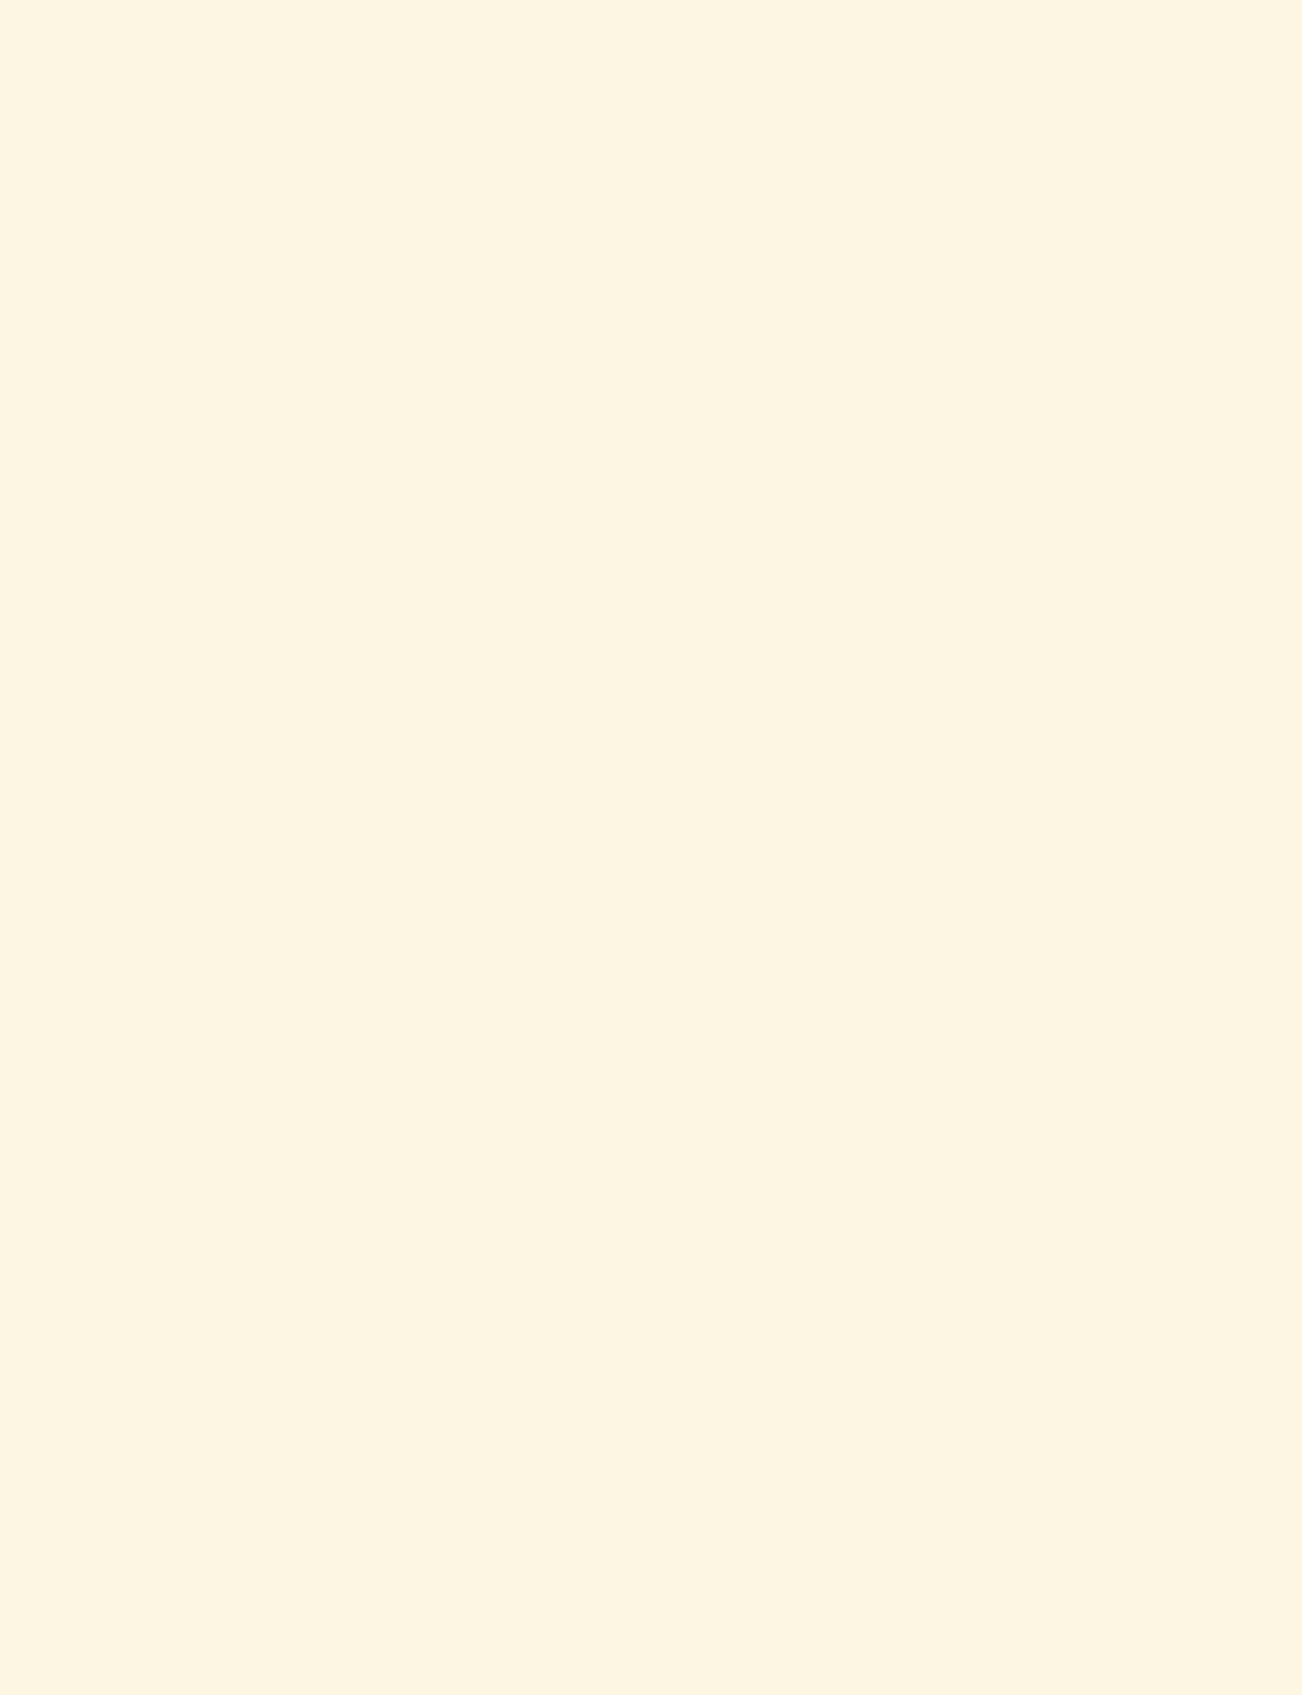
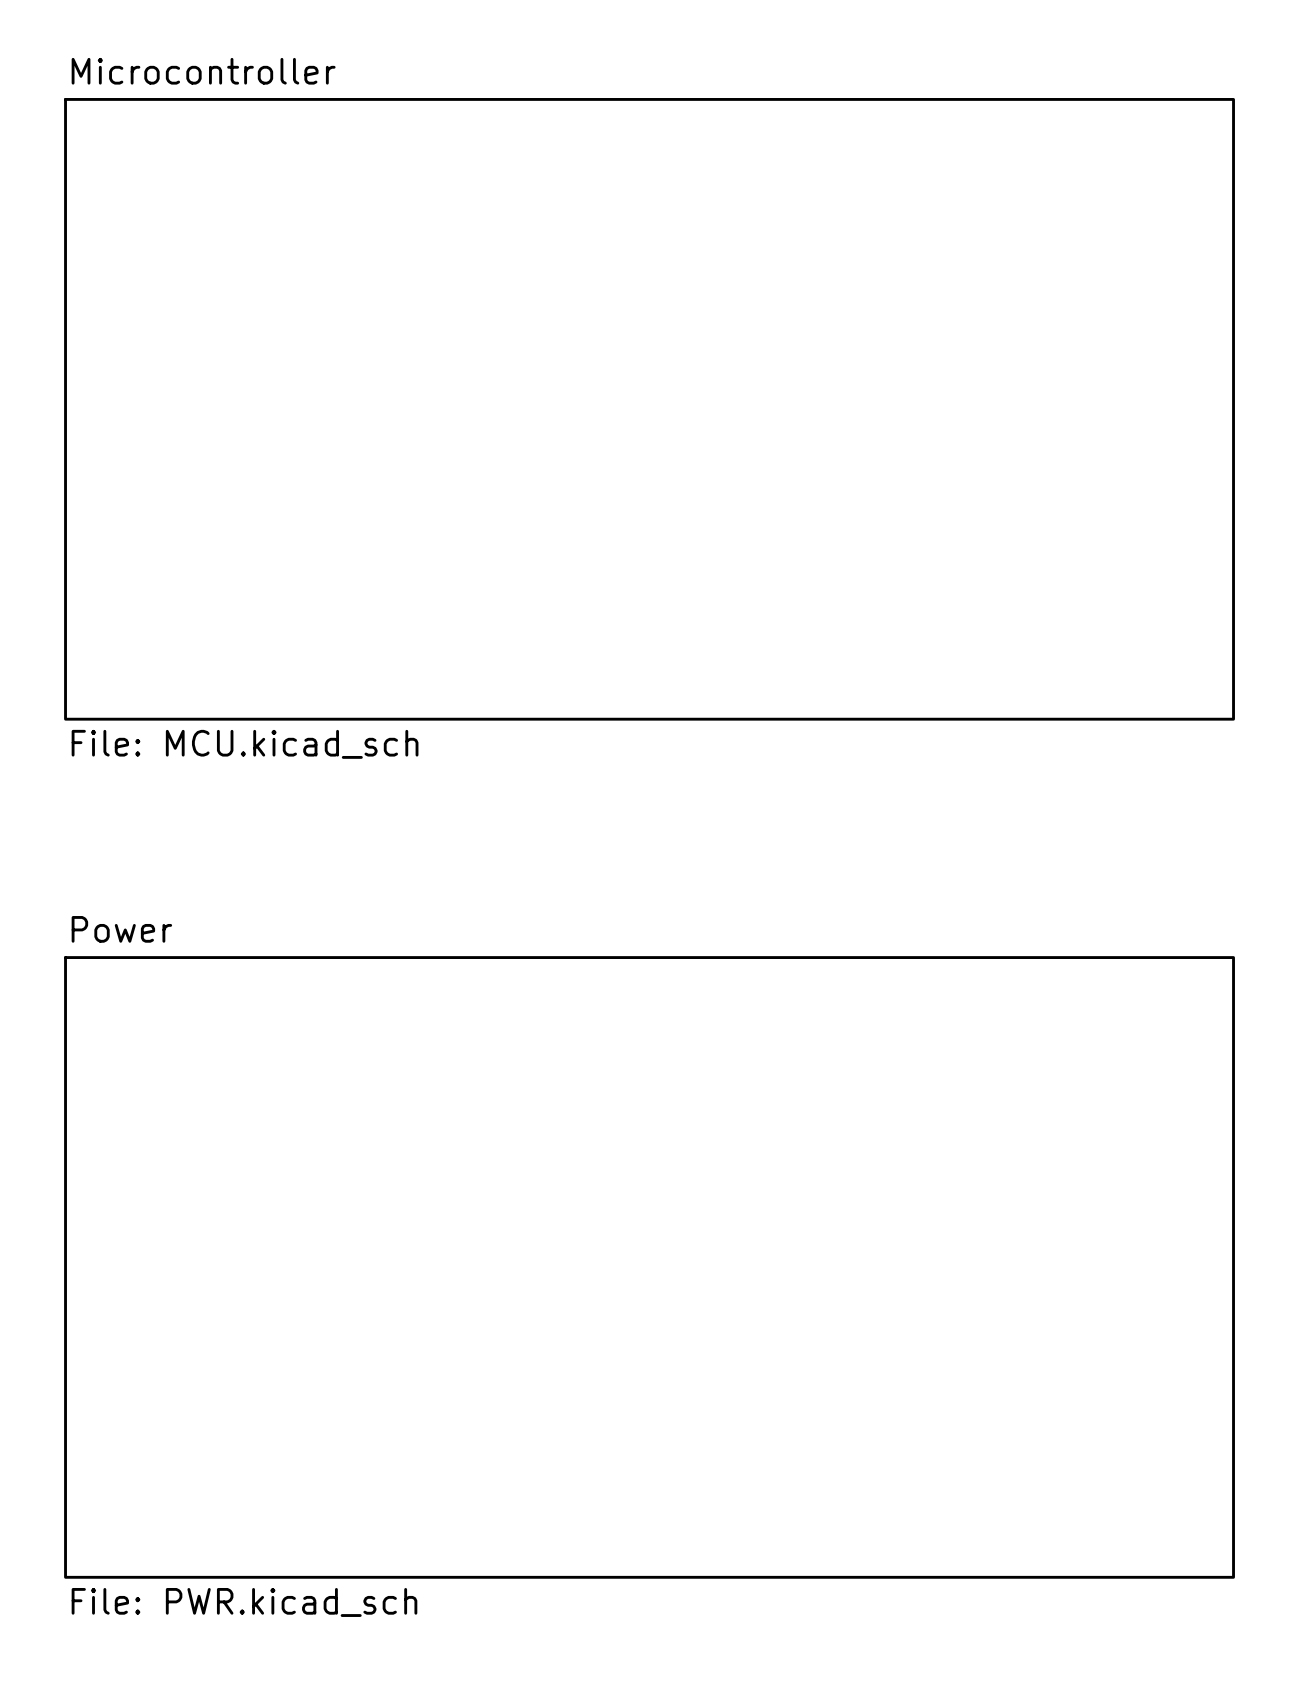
sheet Microcontroller: none -> File: MCU.kicad_sch (649, 409)
sheet Power: none -> File: PWR.kicad_sch (649, 1267)

